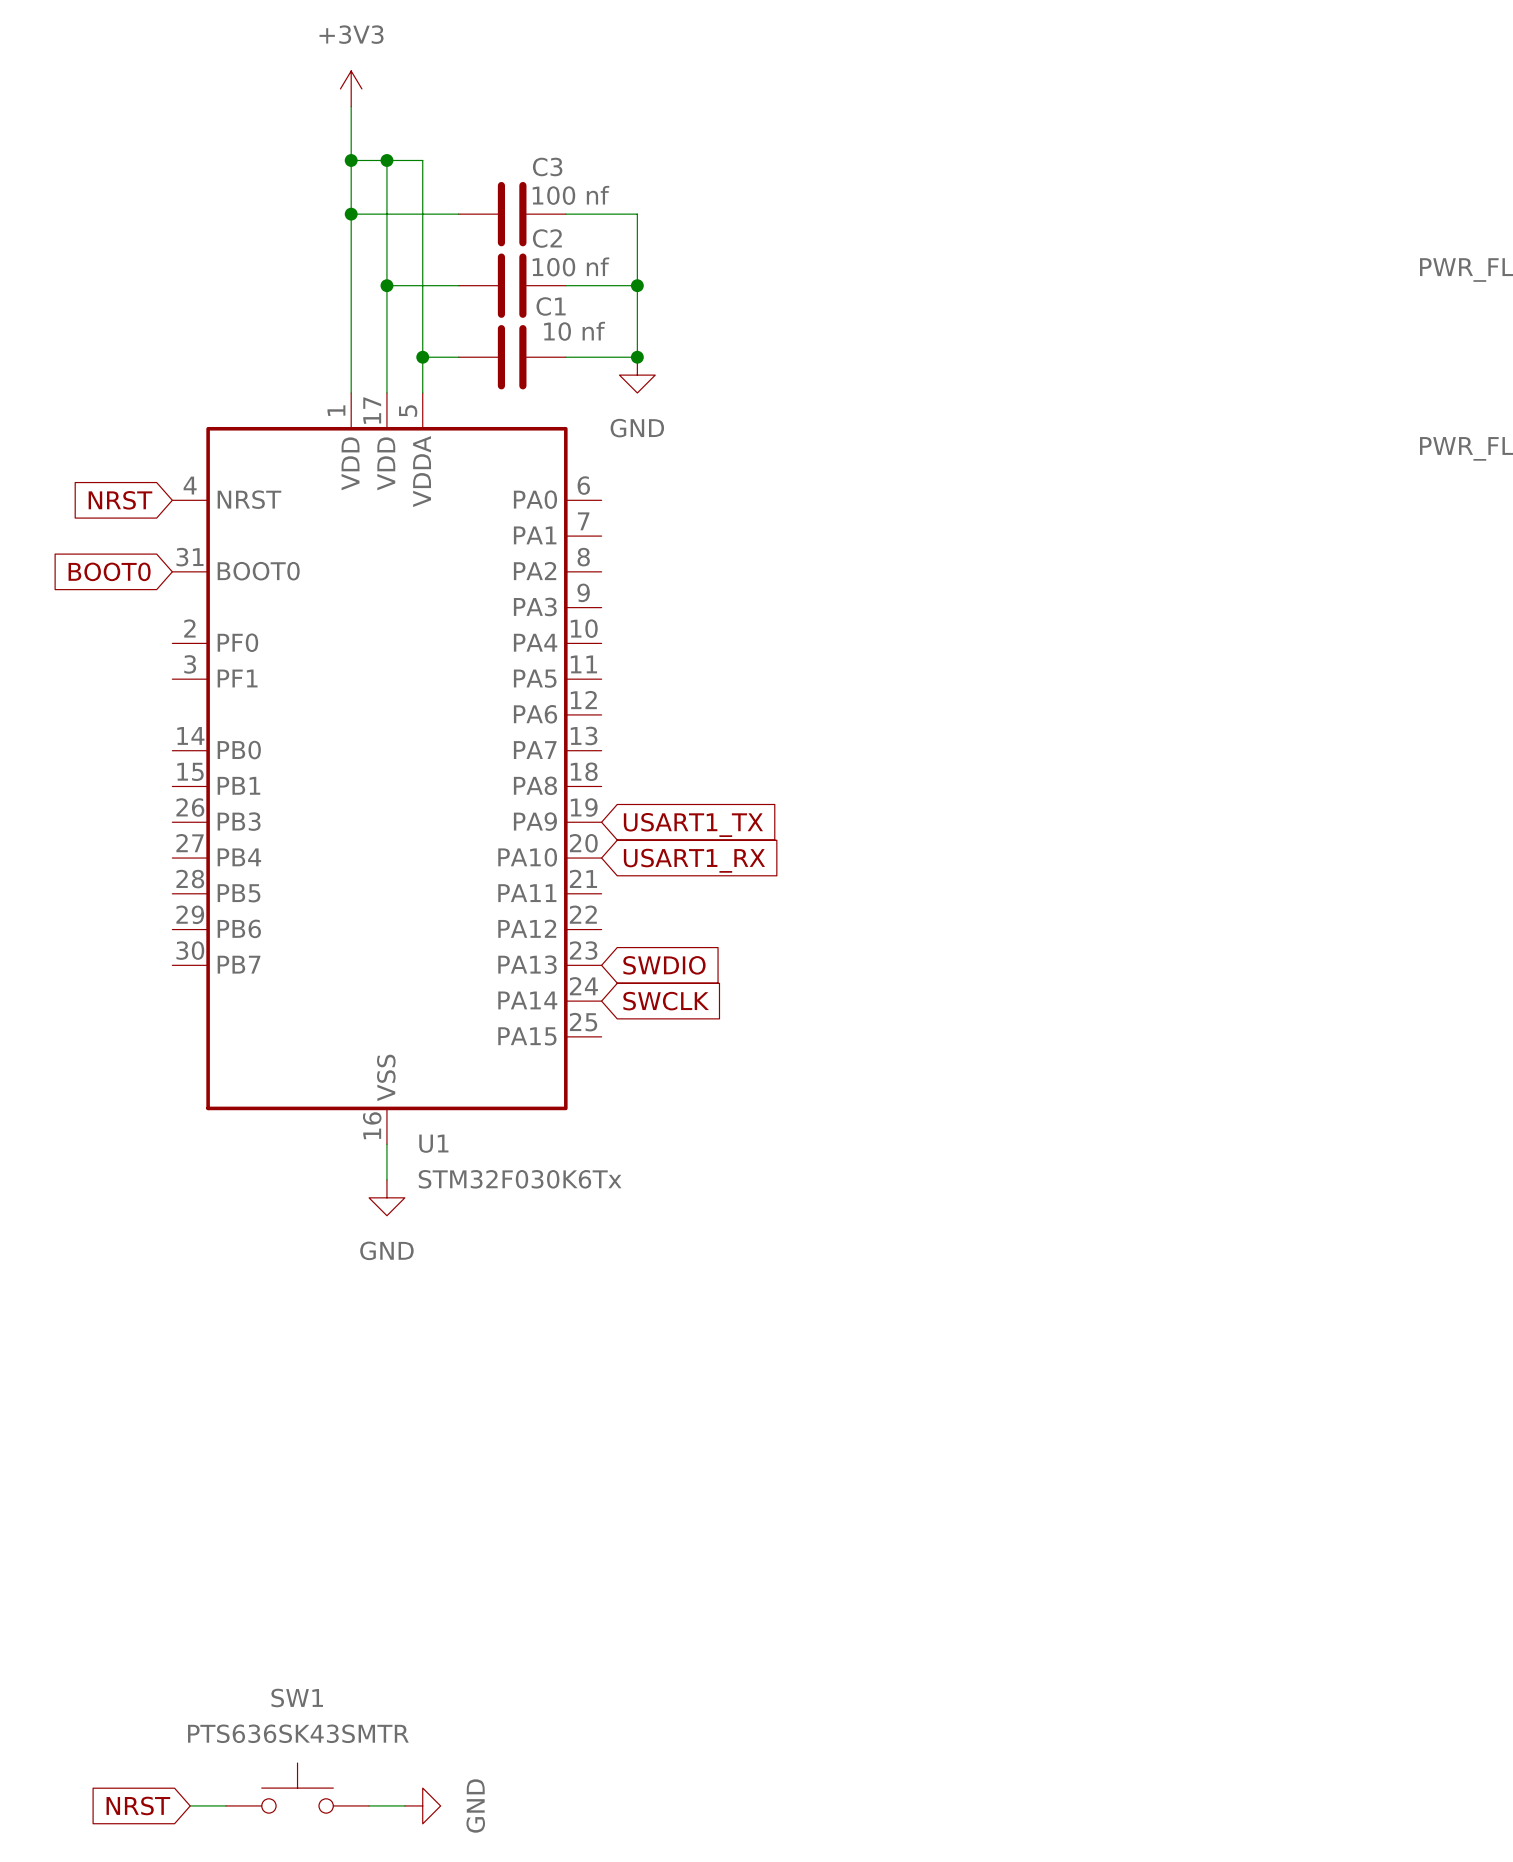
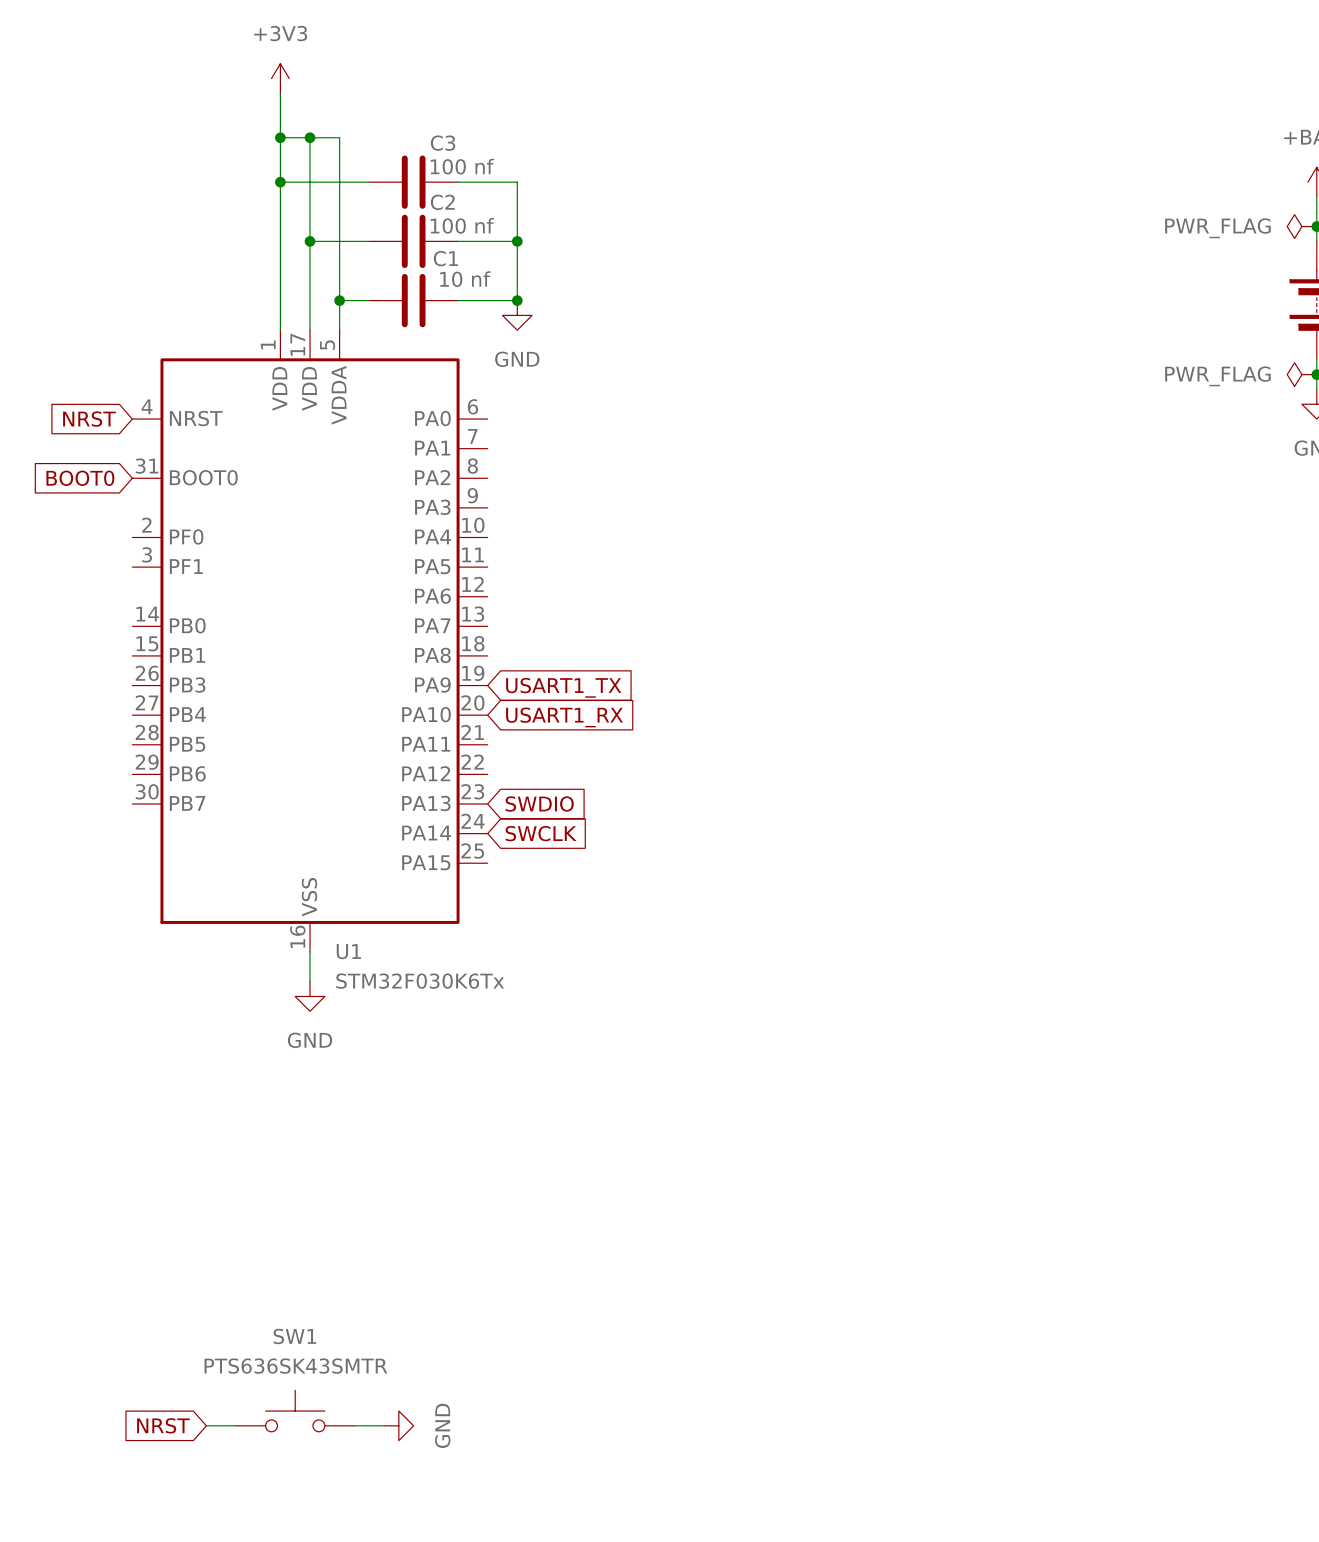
SW1 position: (297, 1788) -> (295, 1411)
global label position: NRST (138, 1805) -> NRST (163, 1425)
wire: (190, 1805) (225, 1805) -> (206, 1425) (235, 1425)
wire: (369, 1805) (404, 1805) -> (354, 1425) (384, 1425)
power symbol position: GND (422, 1805) -> GND (398, 1425)

